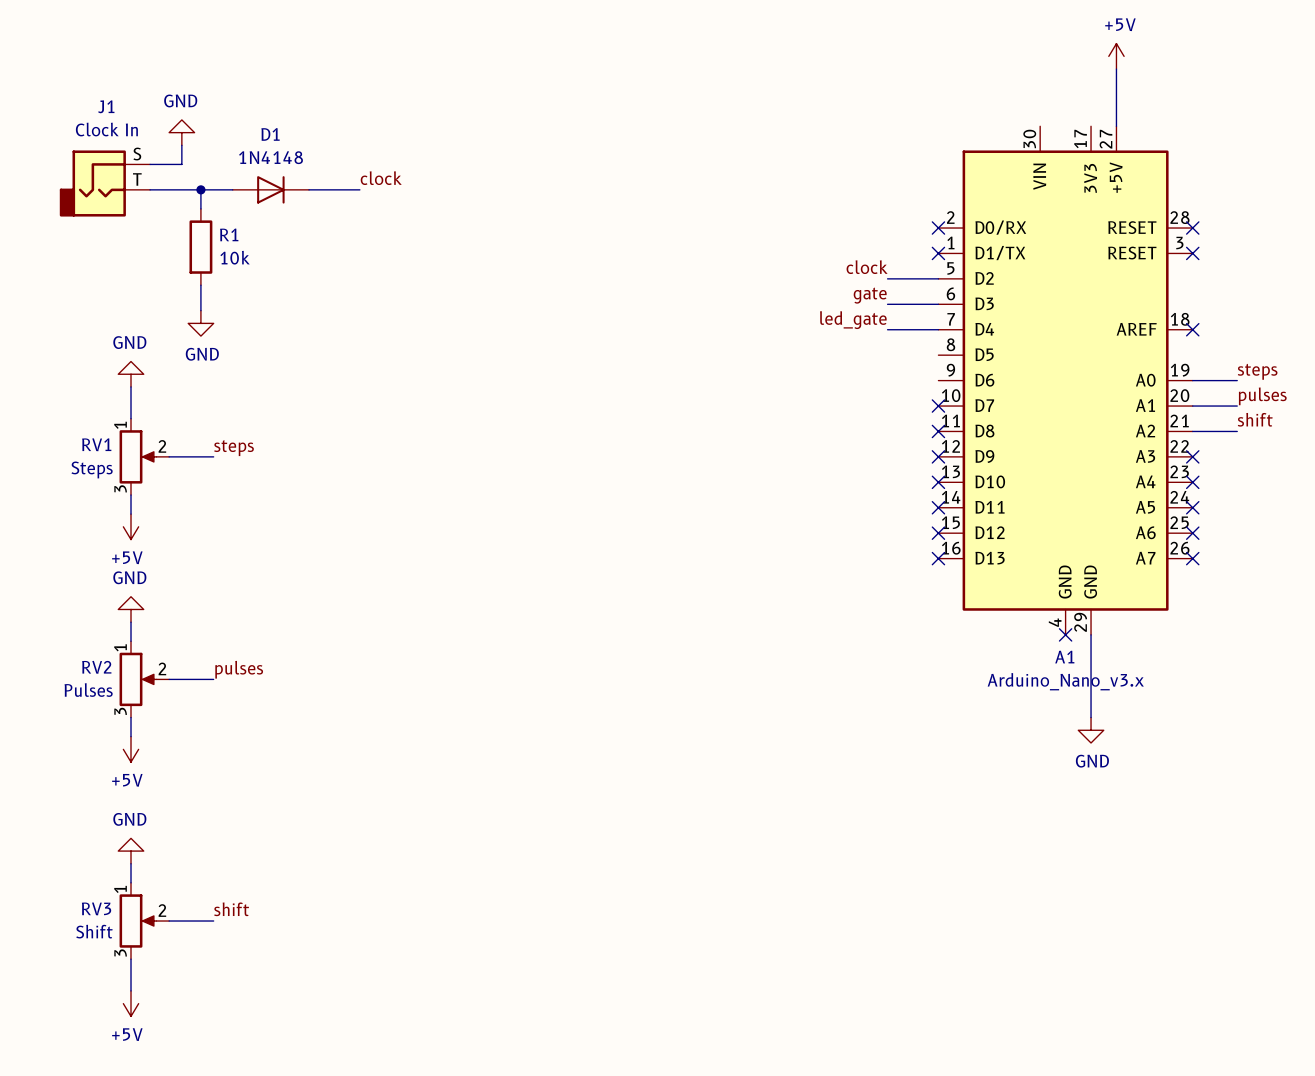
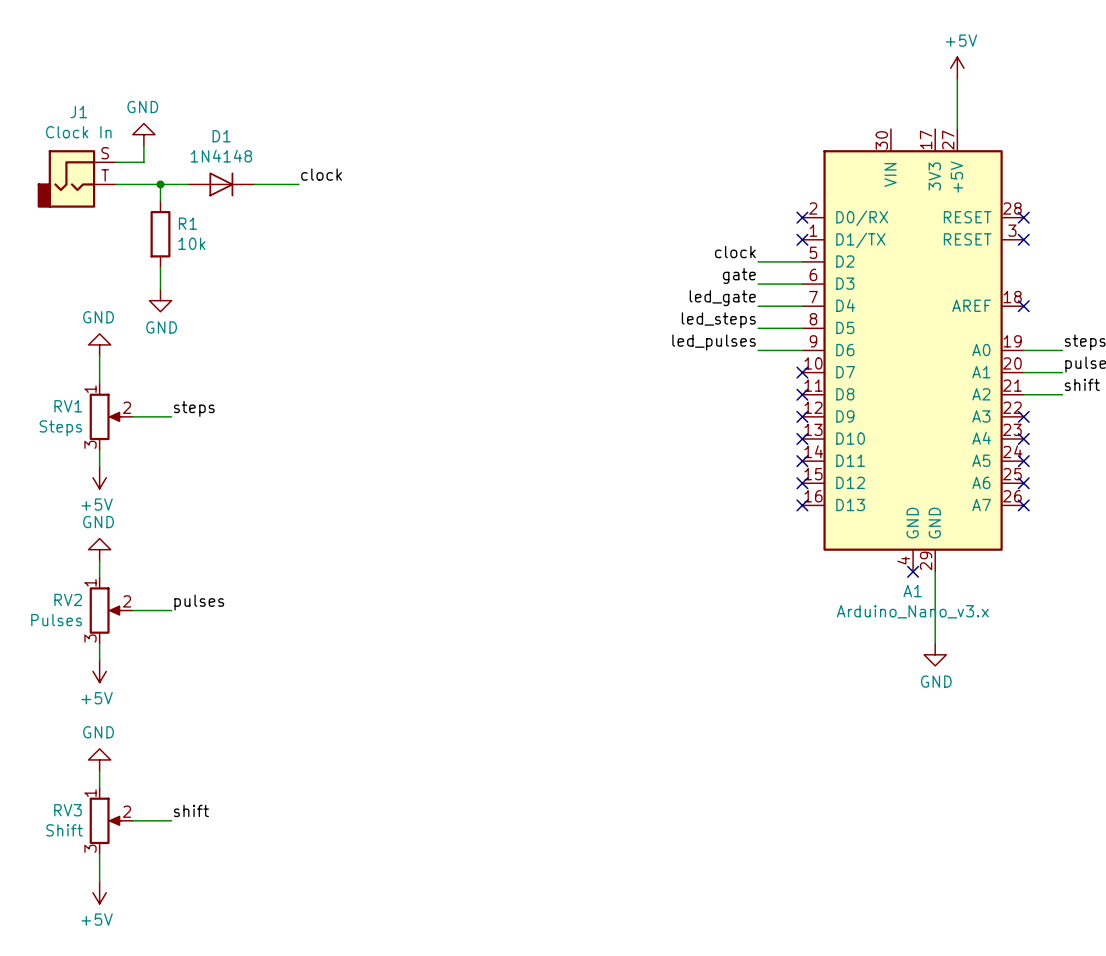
label: none -> led_steps (718, 320)
wire: none -> (758, 328) (802, 328)
label: none -> led_pulses (714, 342)
wire: none -> (758, 350) (802, 350)

